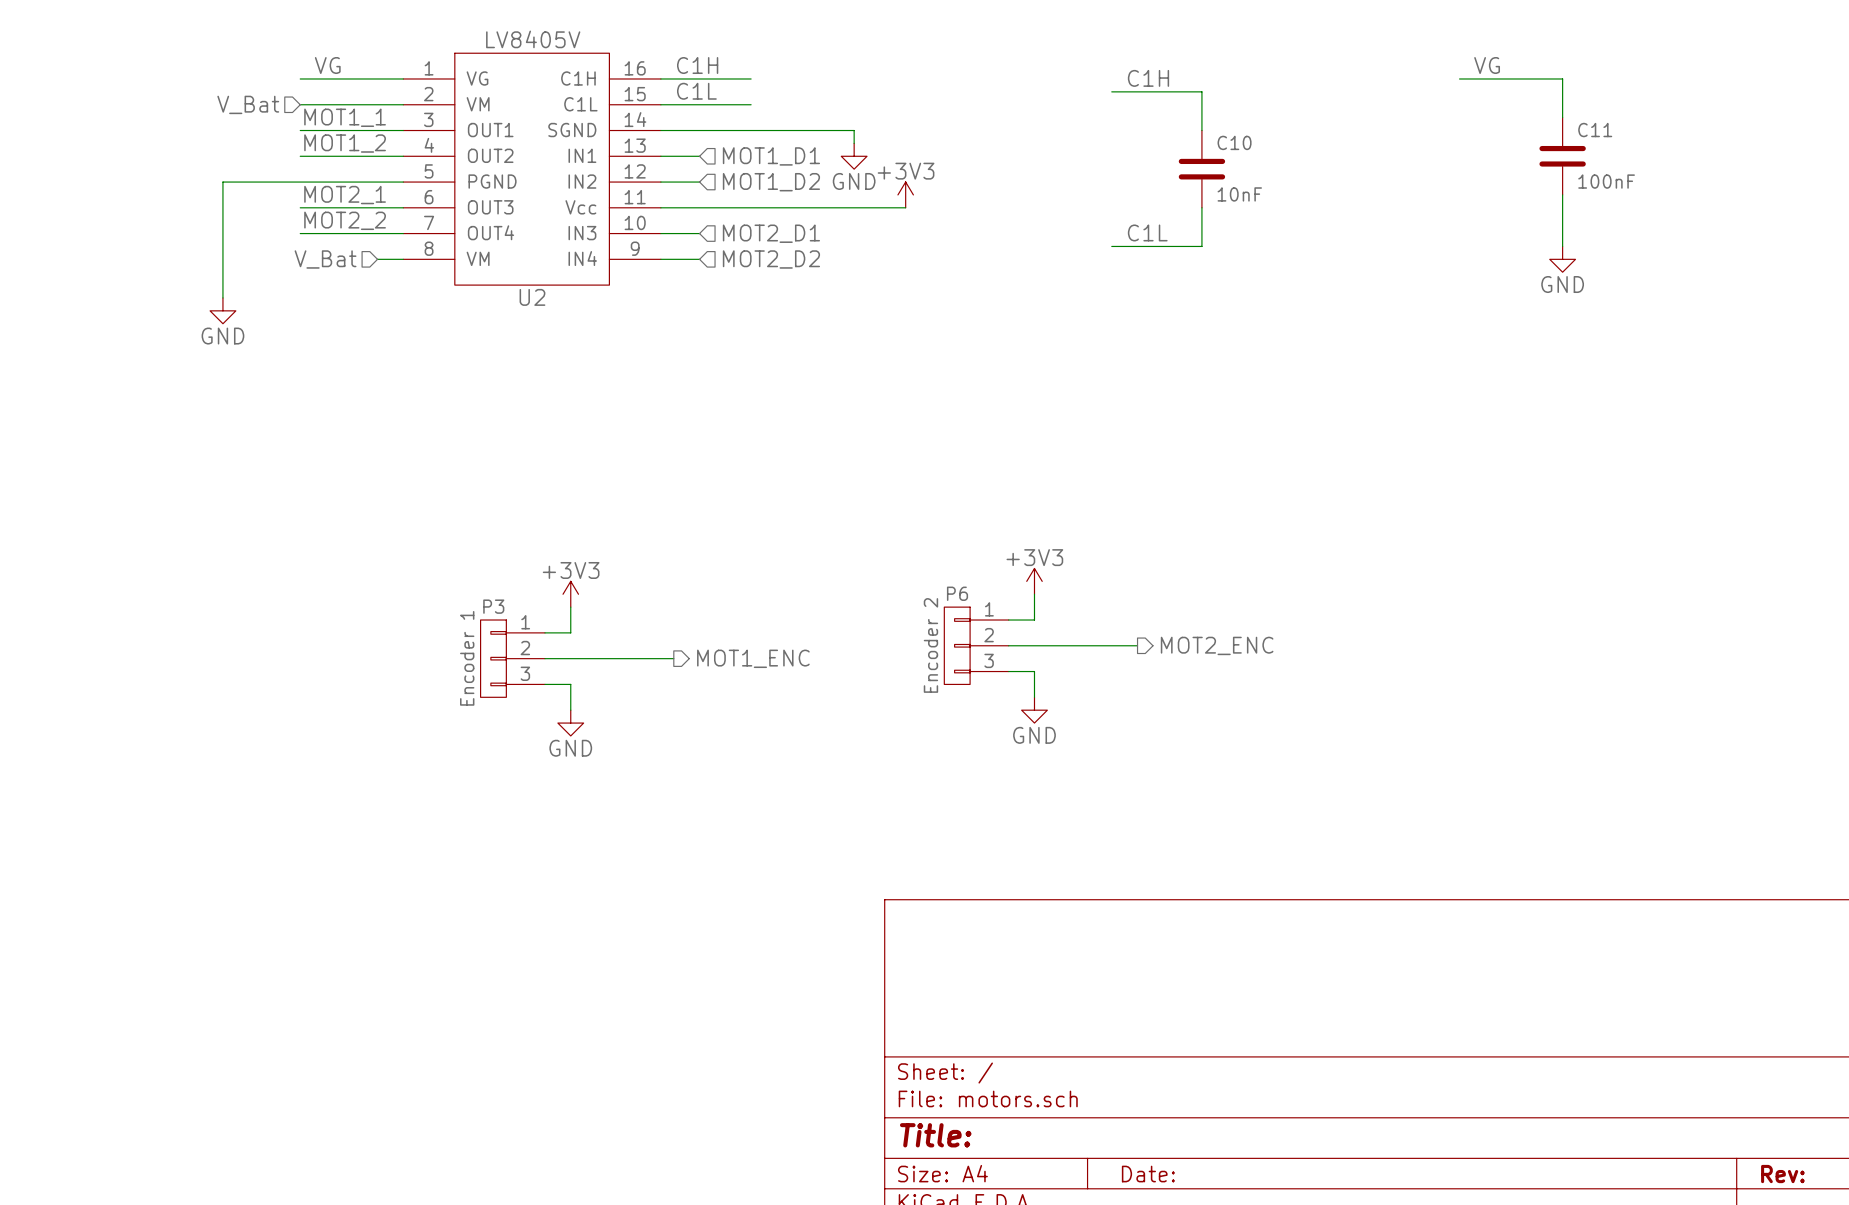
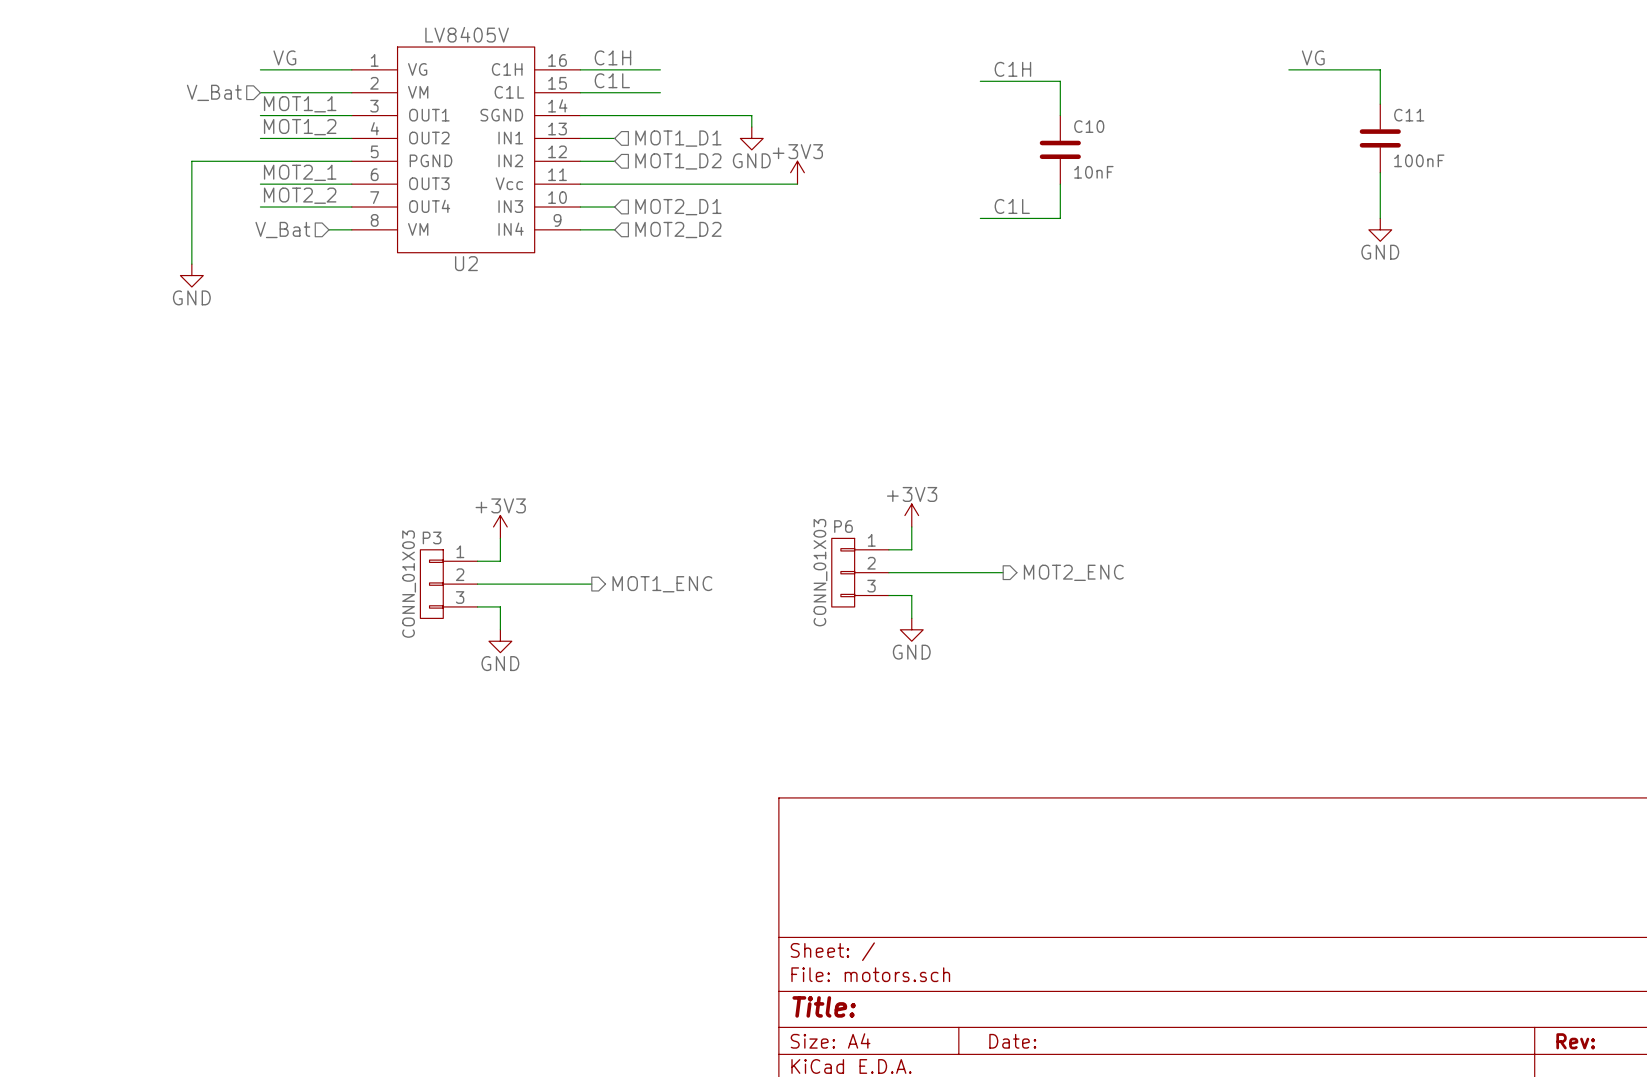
P6 value: Encoder 2 (930, 645) -> CONN_01X03 (820, 572)
P3 value: Encoder 1 (467, 658) -> CONN_01X03 (409, 584)

